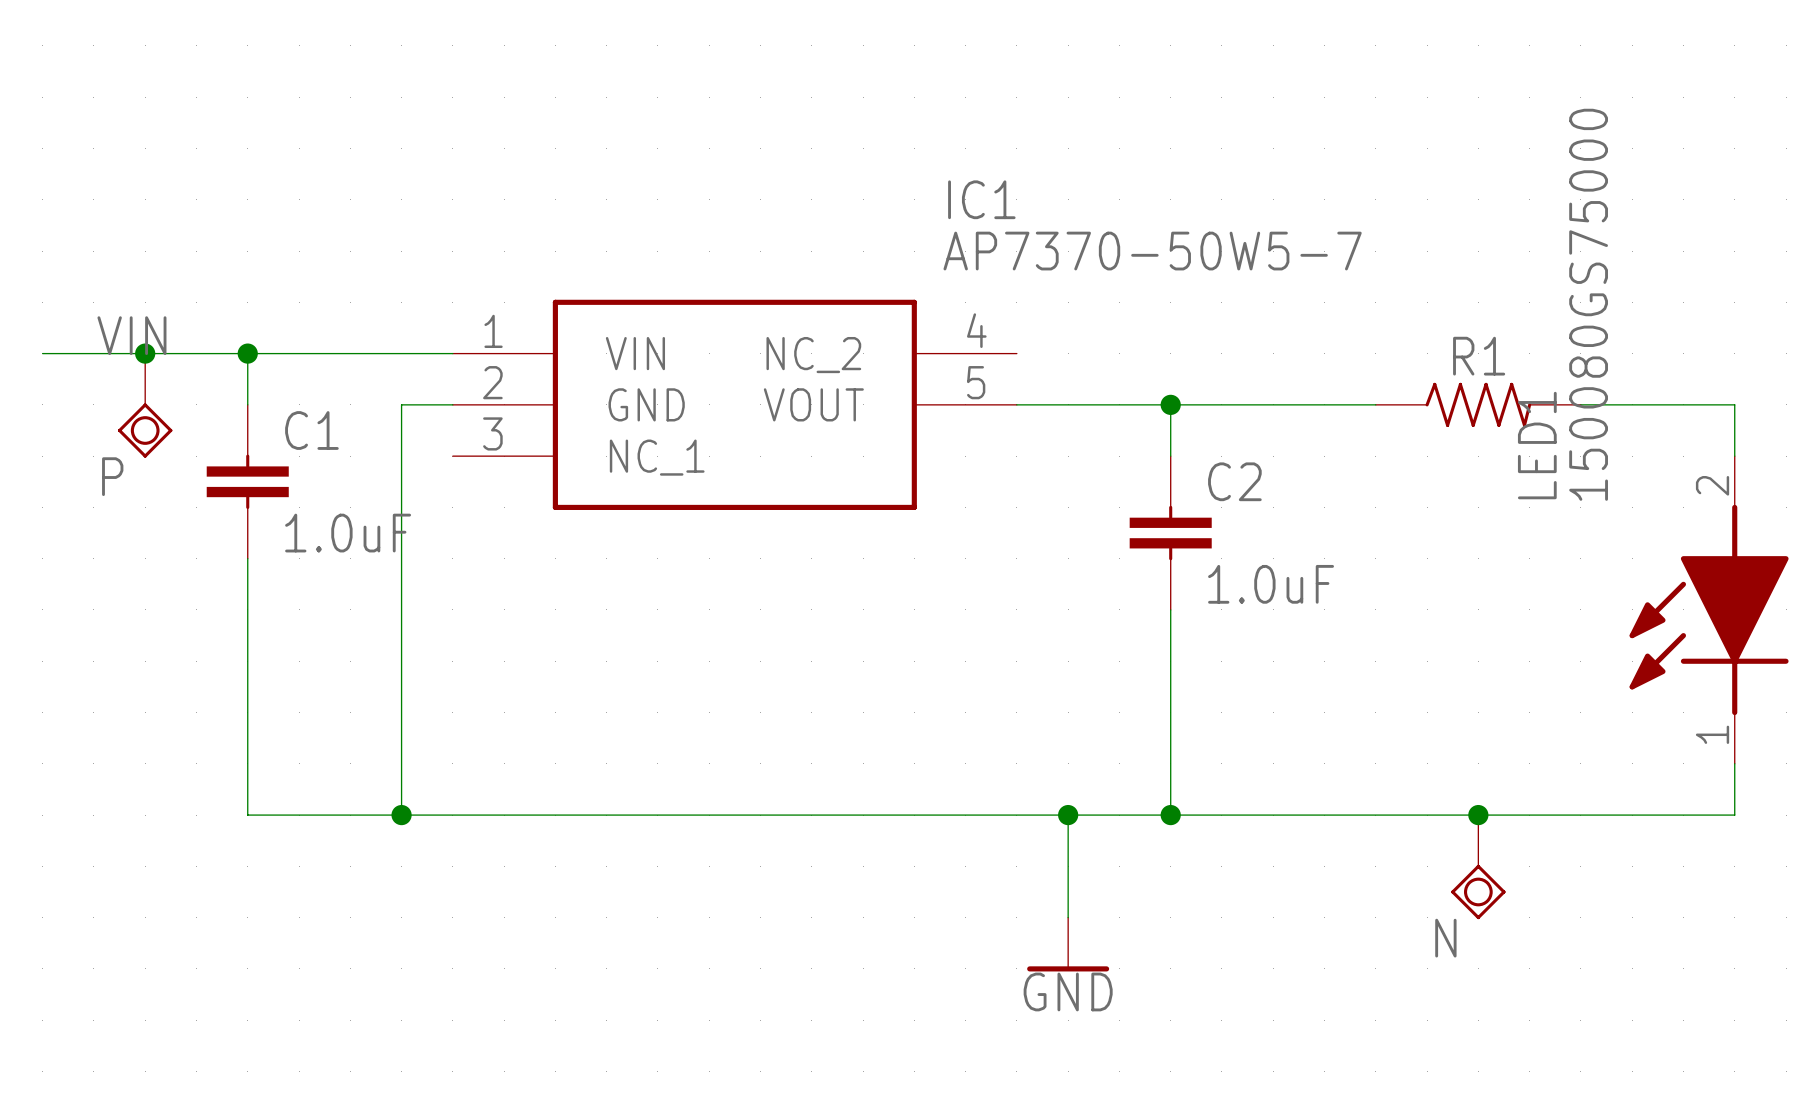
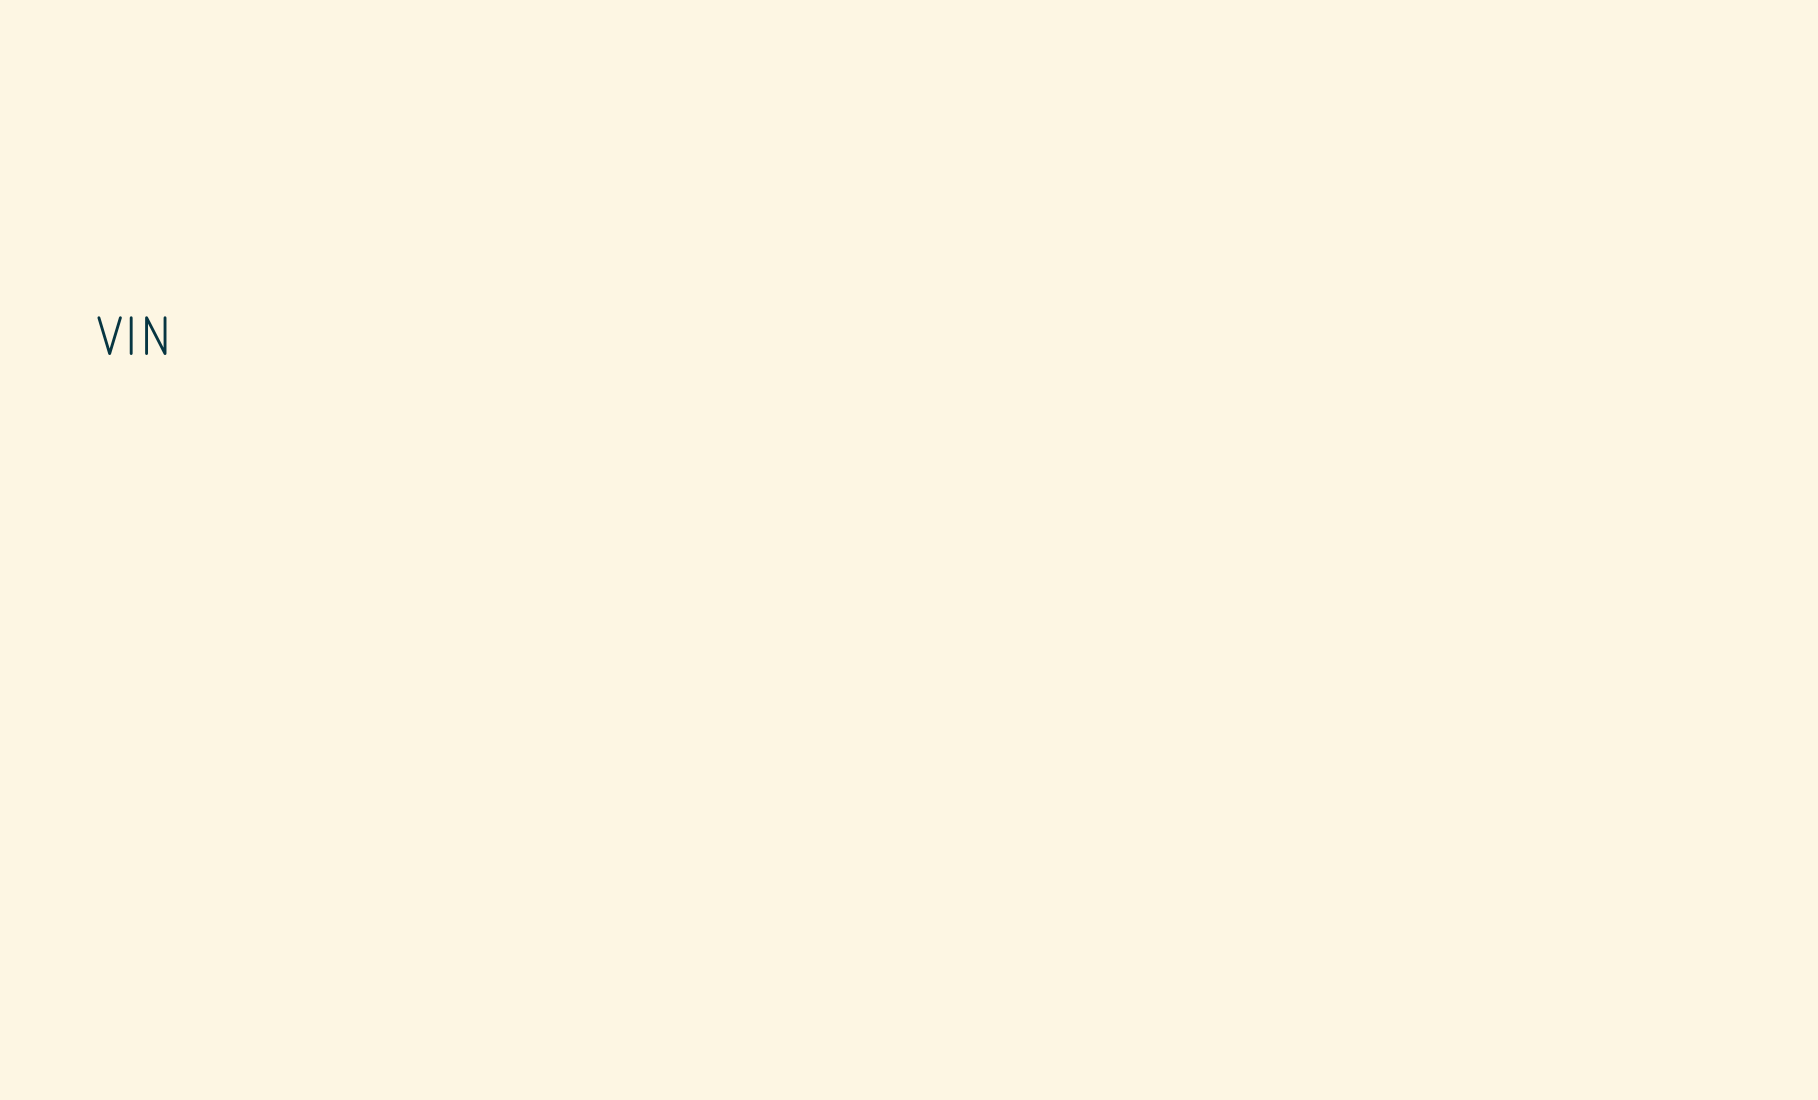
wire: (42, 353) (452, 353) -> none
junction: (145, 353) -> none
wire: (247, 353) (247, 404) -> none
junction: (247, 353) -> none
wire: (452, 404) (401, 404) (401, 815) -> none
IC1: AP7370-50W5-7 (734, 404) -> none
wire: (1016, 404) (1375, 404) -> none
wire: (1170, 404) (1170, 456) -> none
junction: (1170, 404) -> none
R1: (1478, 404) -> none
wire: (1580, 404) (1734, 404) (1734, 456) -> none
P: (145, 405) -> none
C1: 1.0uF (247, 481) -> none
C2: 1.0uF (1170, 533) -> none
wire: (247, 558) (247, 815) (1734, 815) (1734, 763) -> none
wire: (1170, 609) (1170, 815) -> none
LED1: 150080GS75000 (1709, 609) -> none
junction: (401, 815) -> none
wire: (1068, 815) (1068, 917) -> none
junction: (1068, 815) -> none
junction: (1170, 815) -> none
junction: (1478, 815) -> none
N: (1478, 867) -> none
power symbol: GND (1068, 944) -> none

